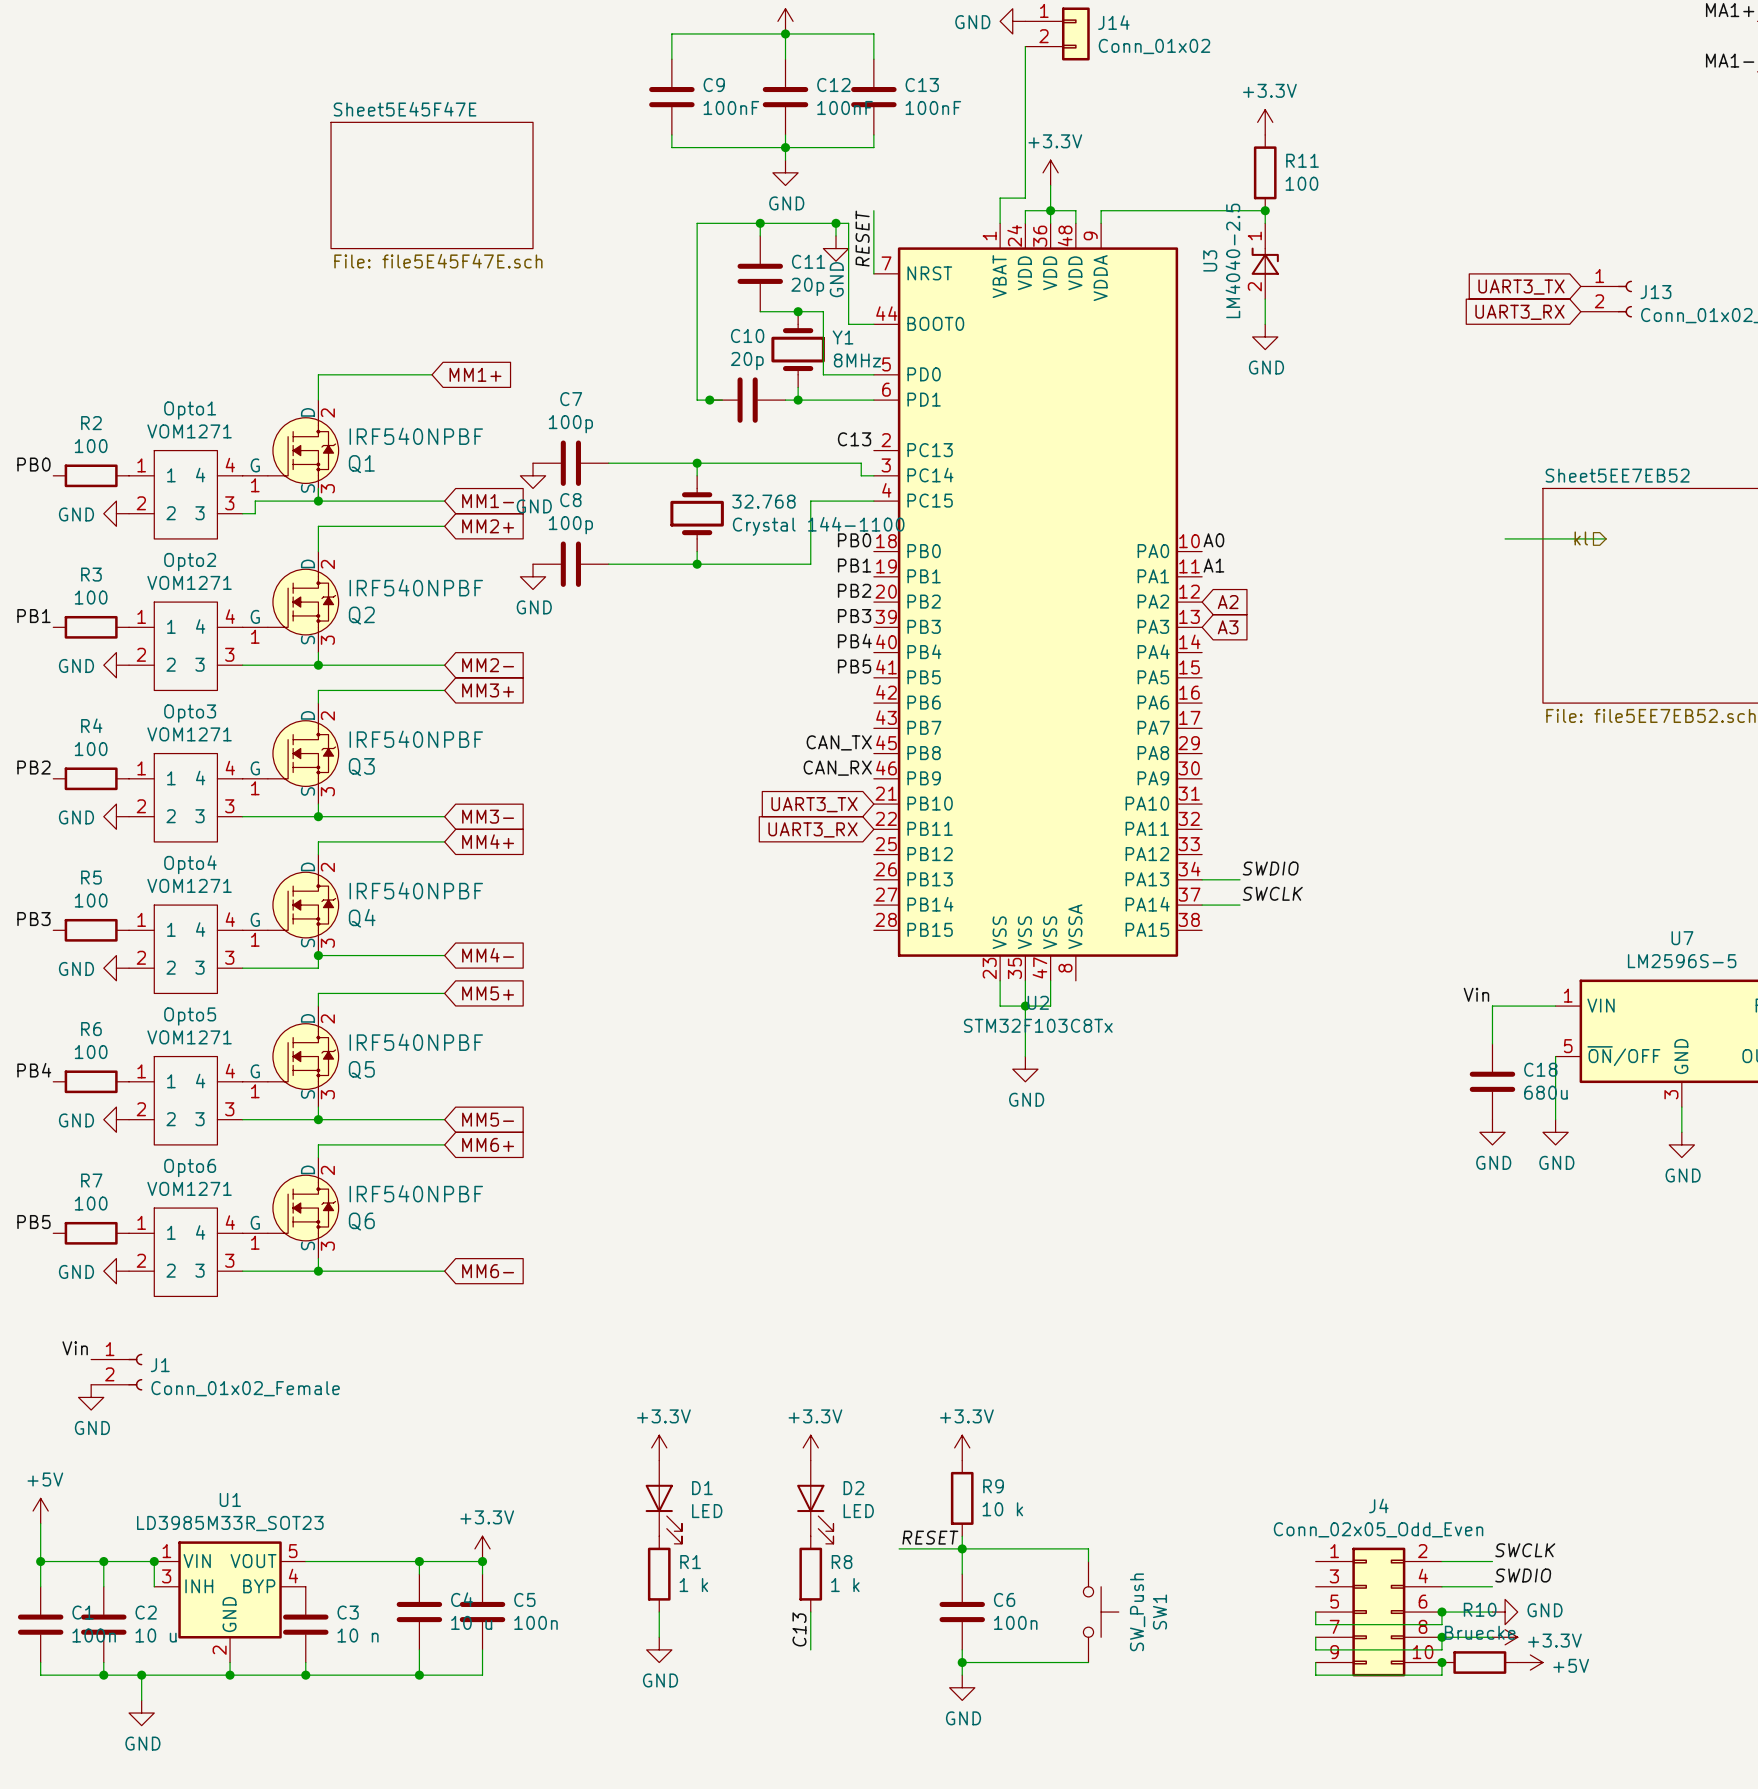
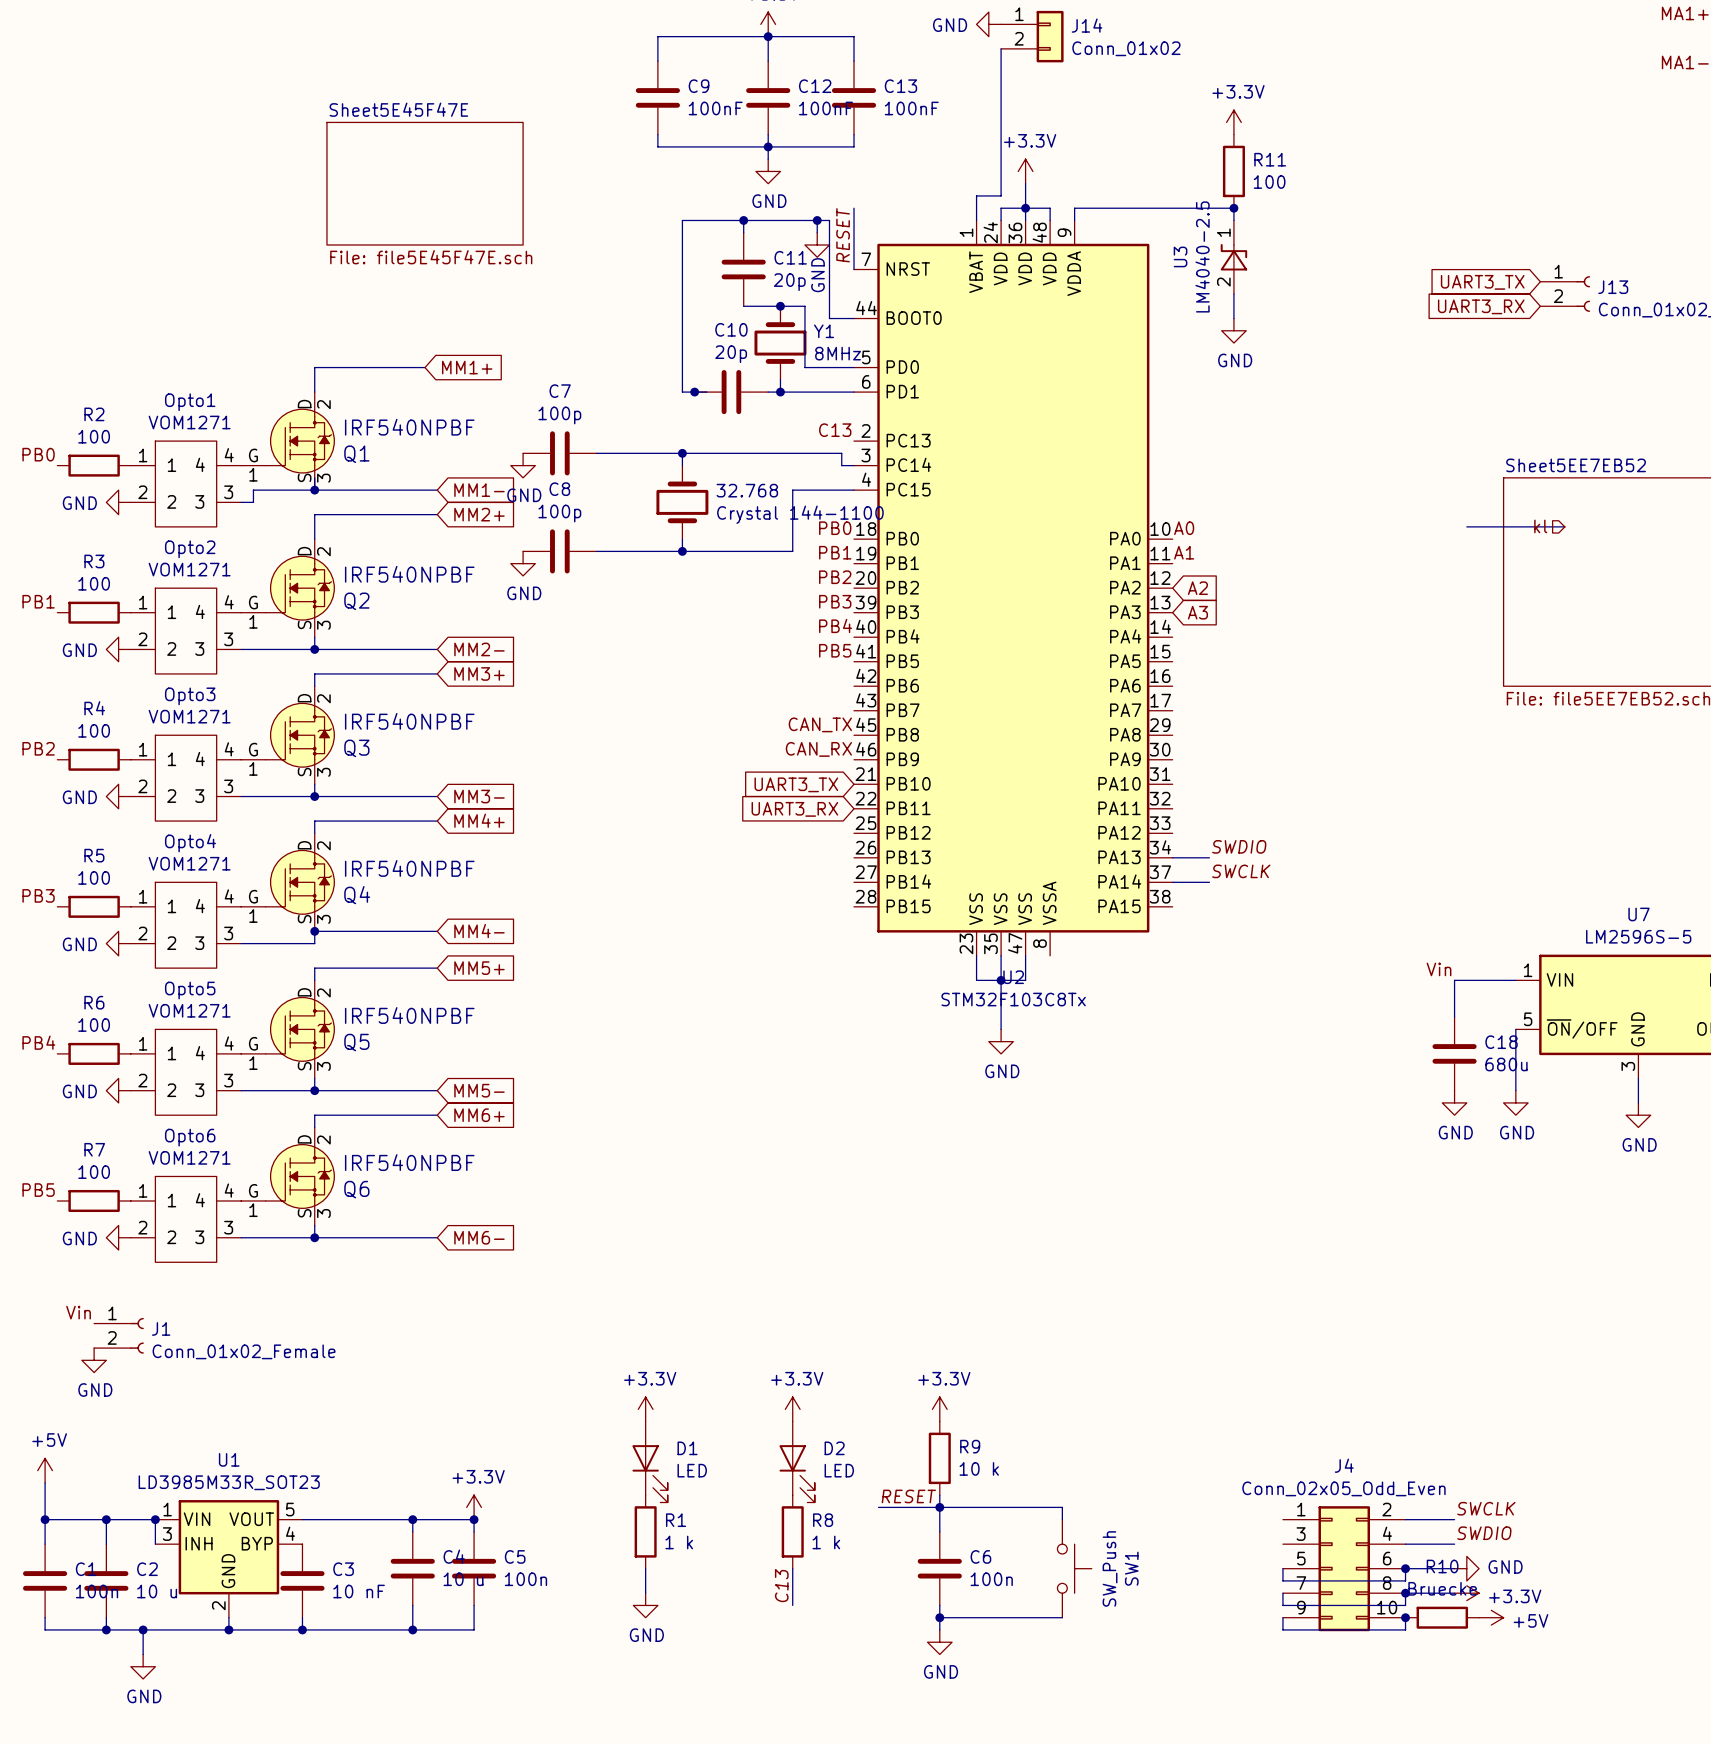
C3 value: 10 n (358, 1635) -> 10 nF (359, 1591)

